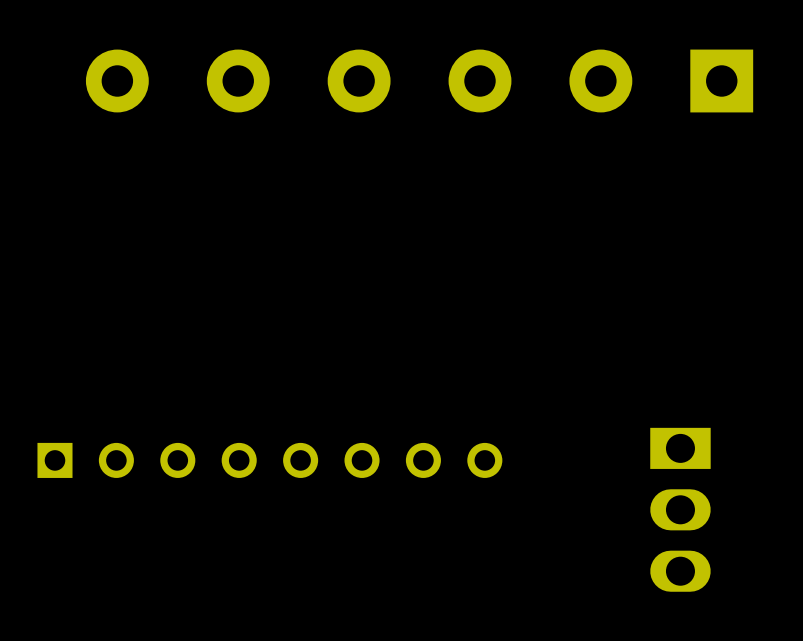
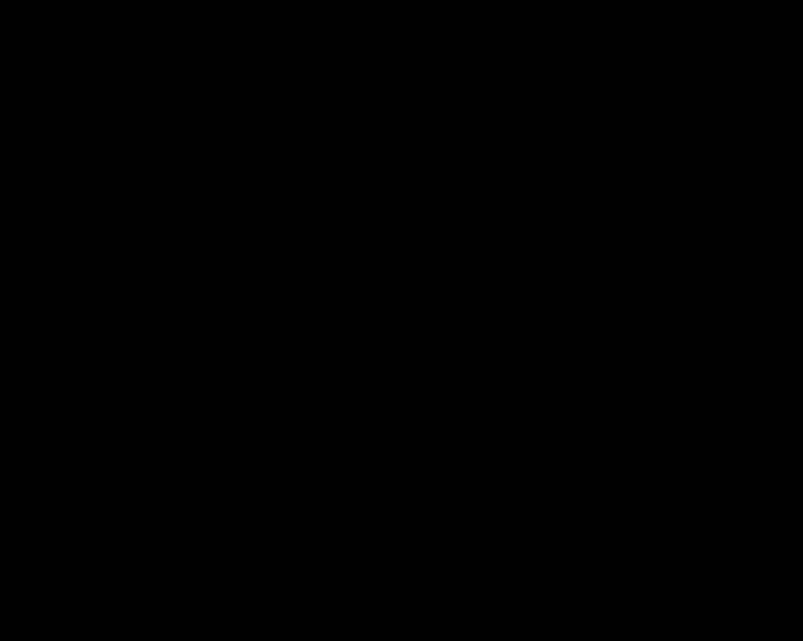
part: (419, 80) -> none
part: (269, 460) -> none
part: (680, 509) -> none

